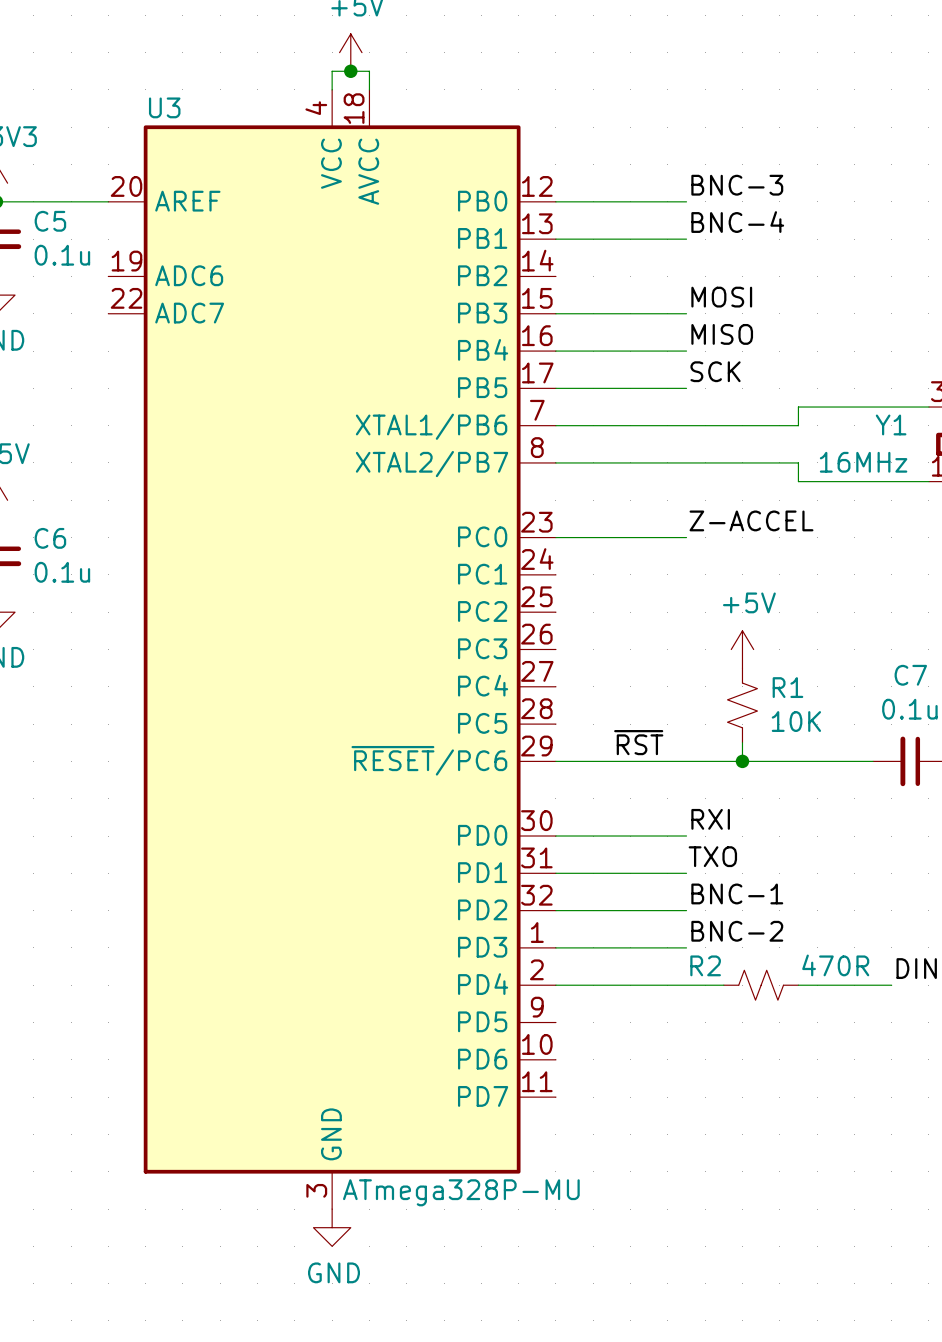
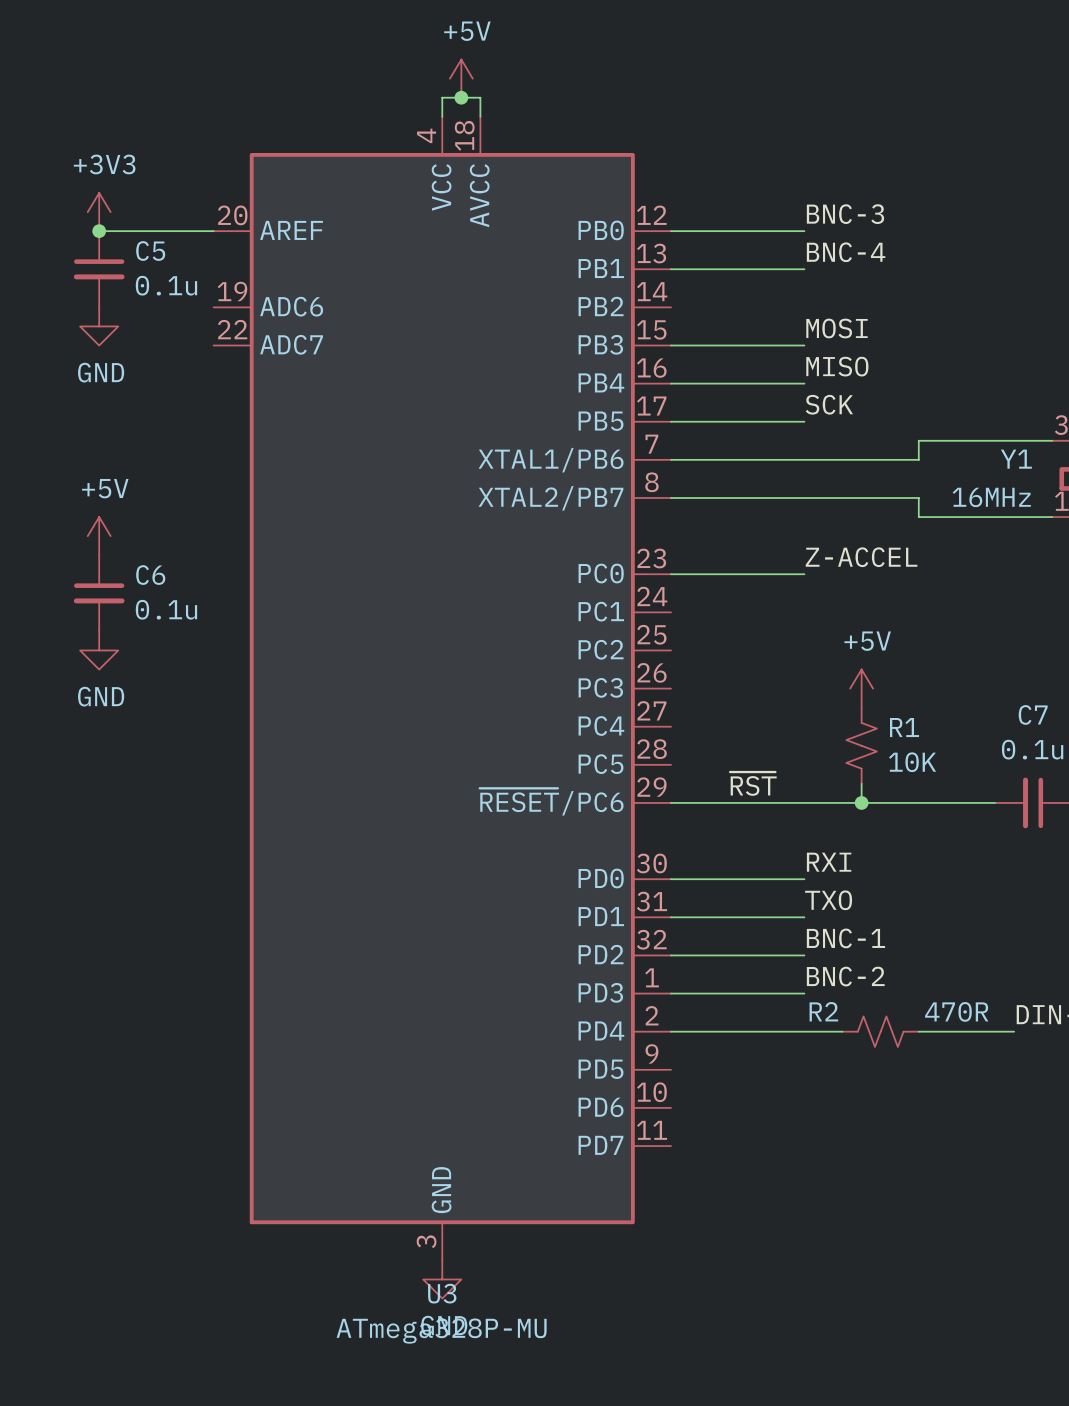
U3 name position: U3 (164, 107) -> U3 (442, 1293)
U3 value position: ATmega328P-MU (461, 1192) -> ATmega328P-MU (441, 1331)

